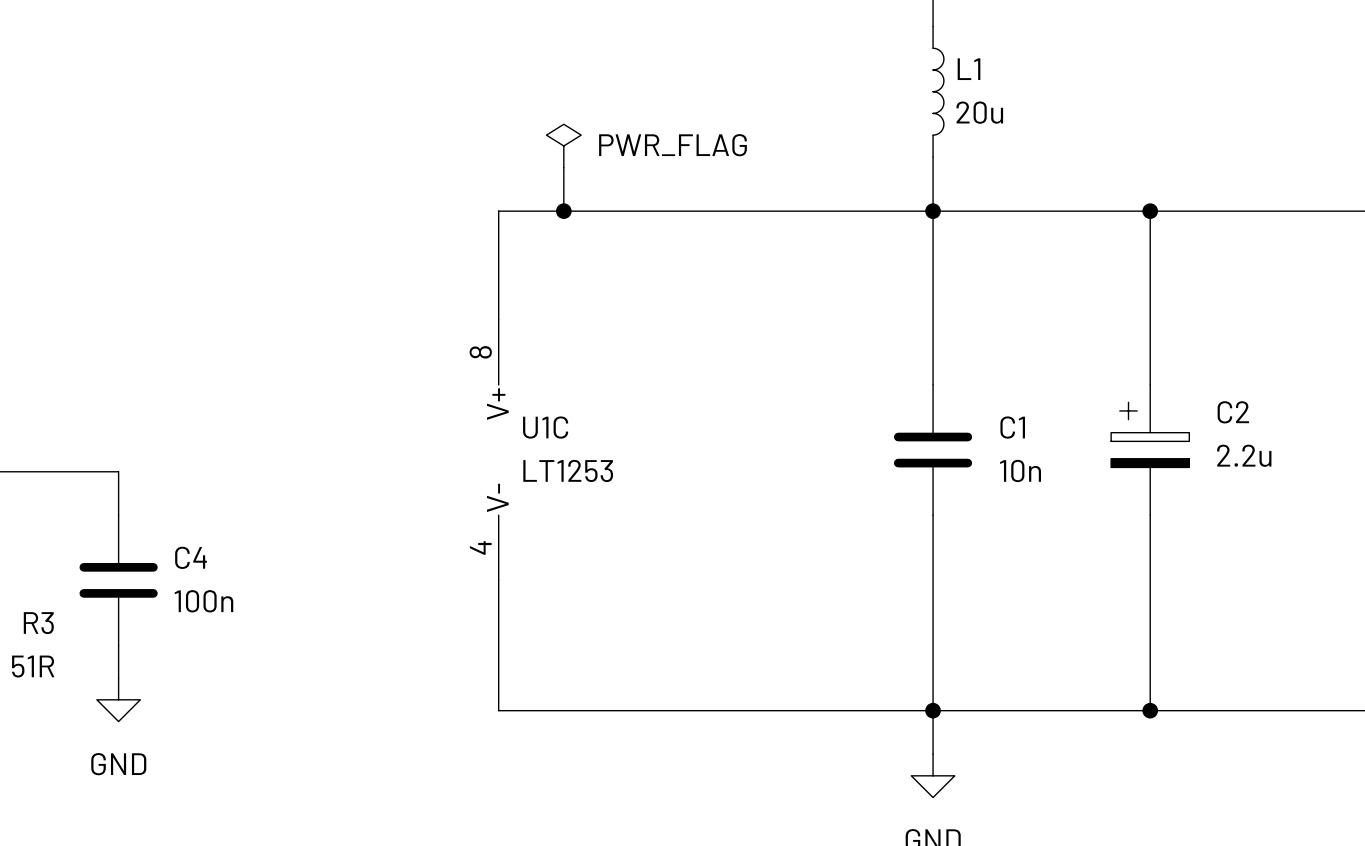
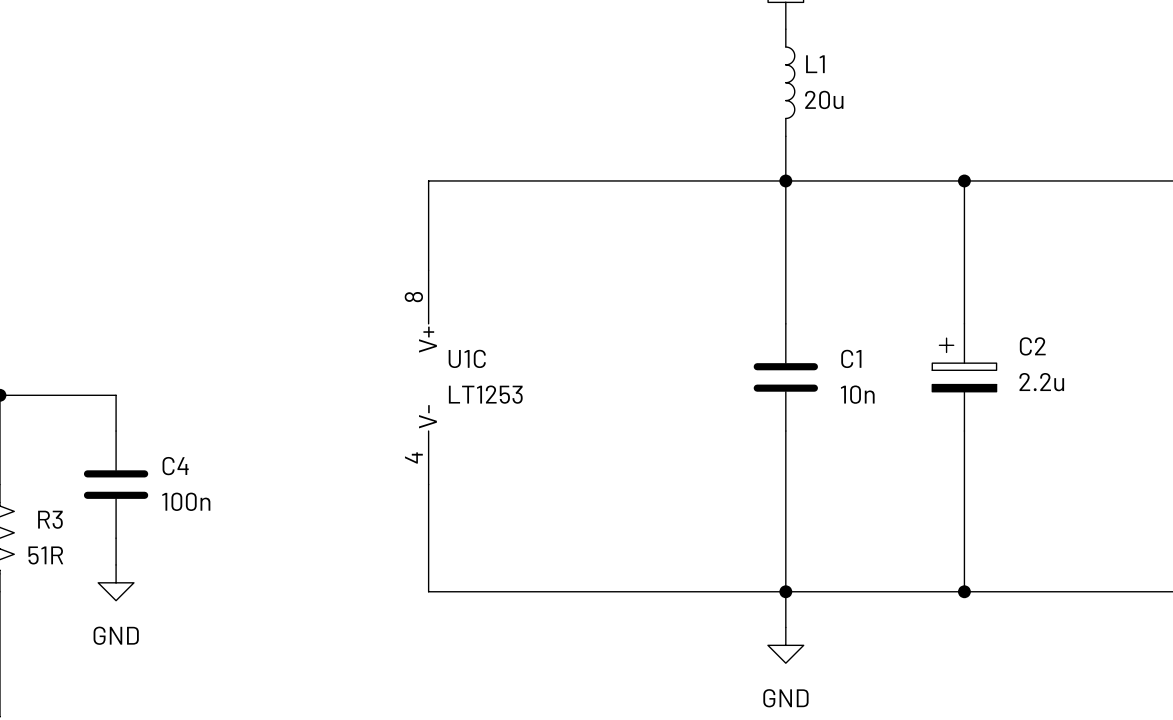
power symbol: PWR_FLAG (563, 146) -> none
wire: (563, 167) (563, 211) -> none
junction: (563, 211) -> none

